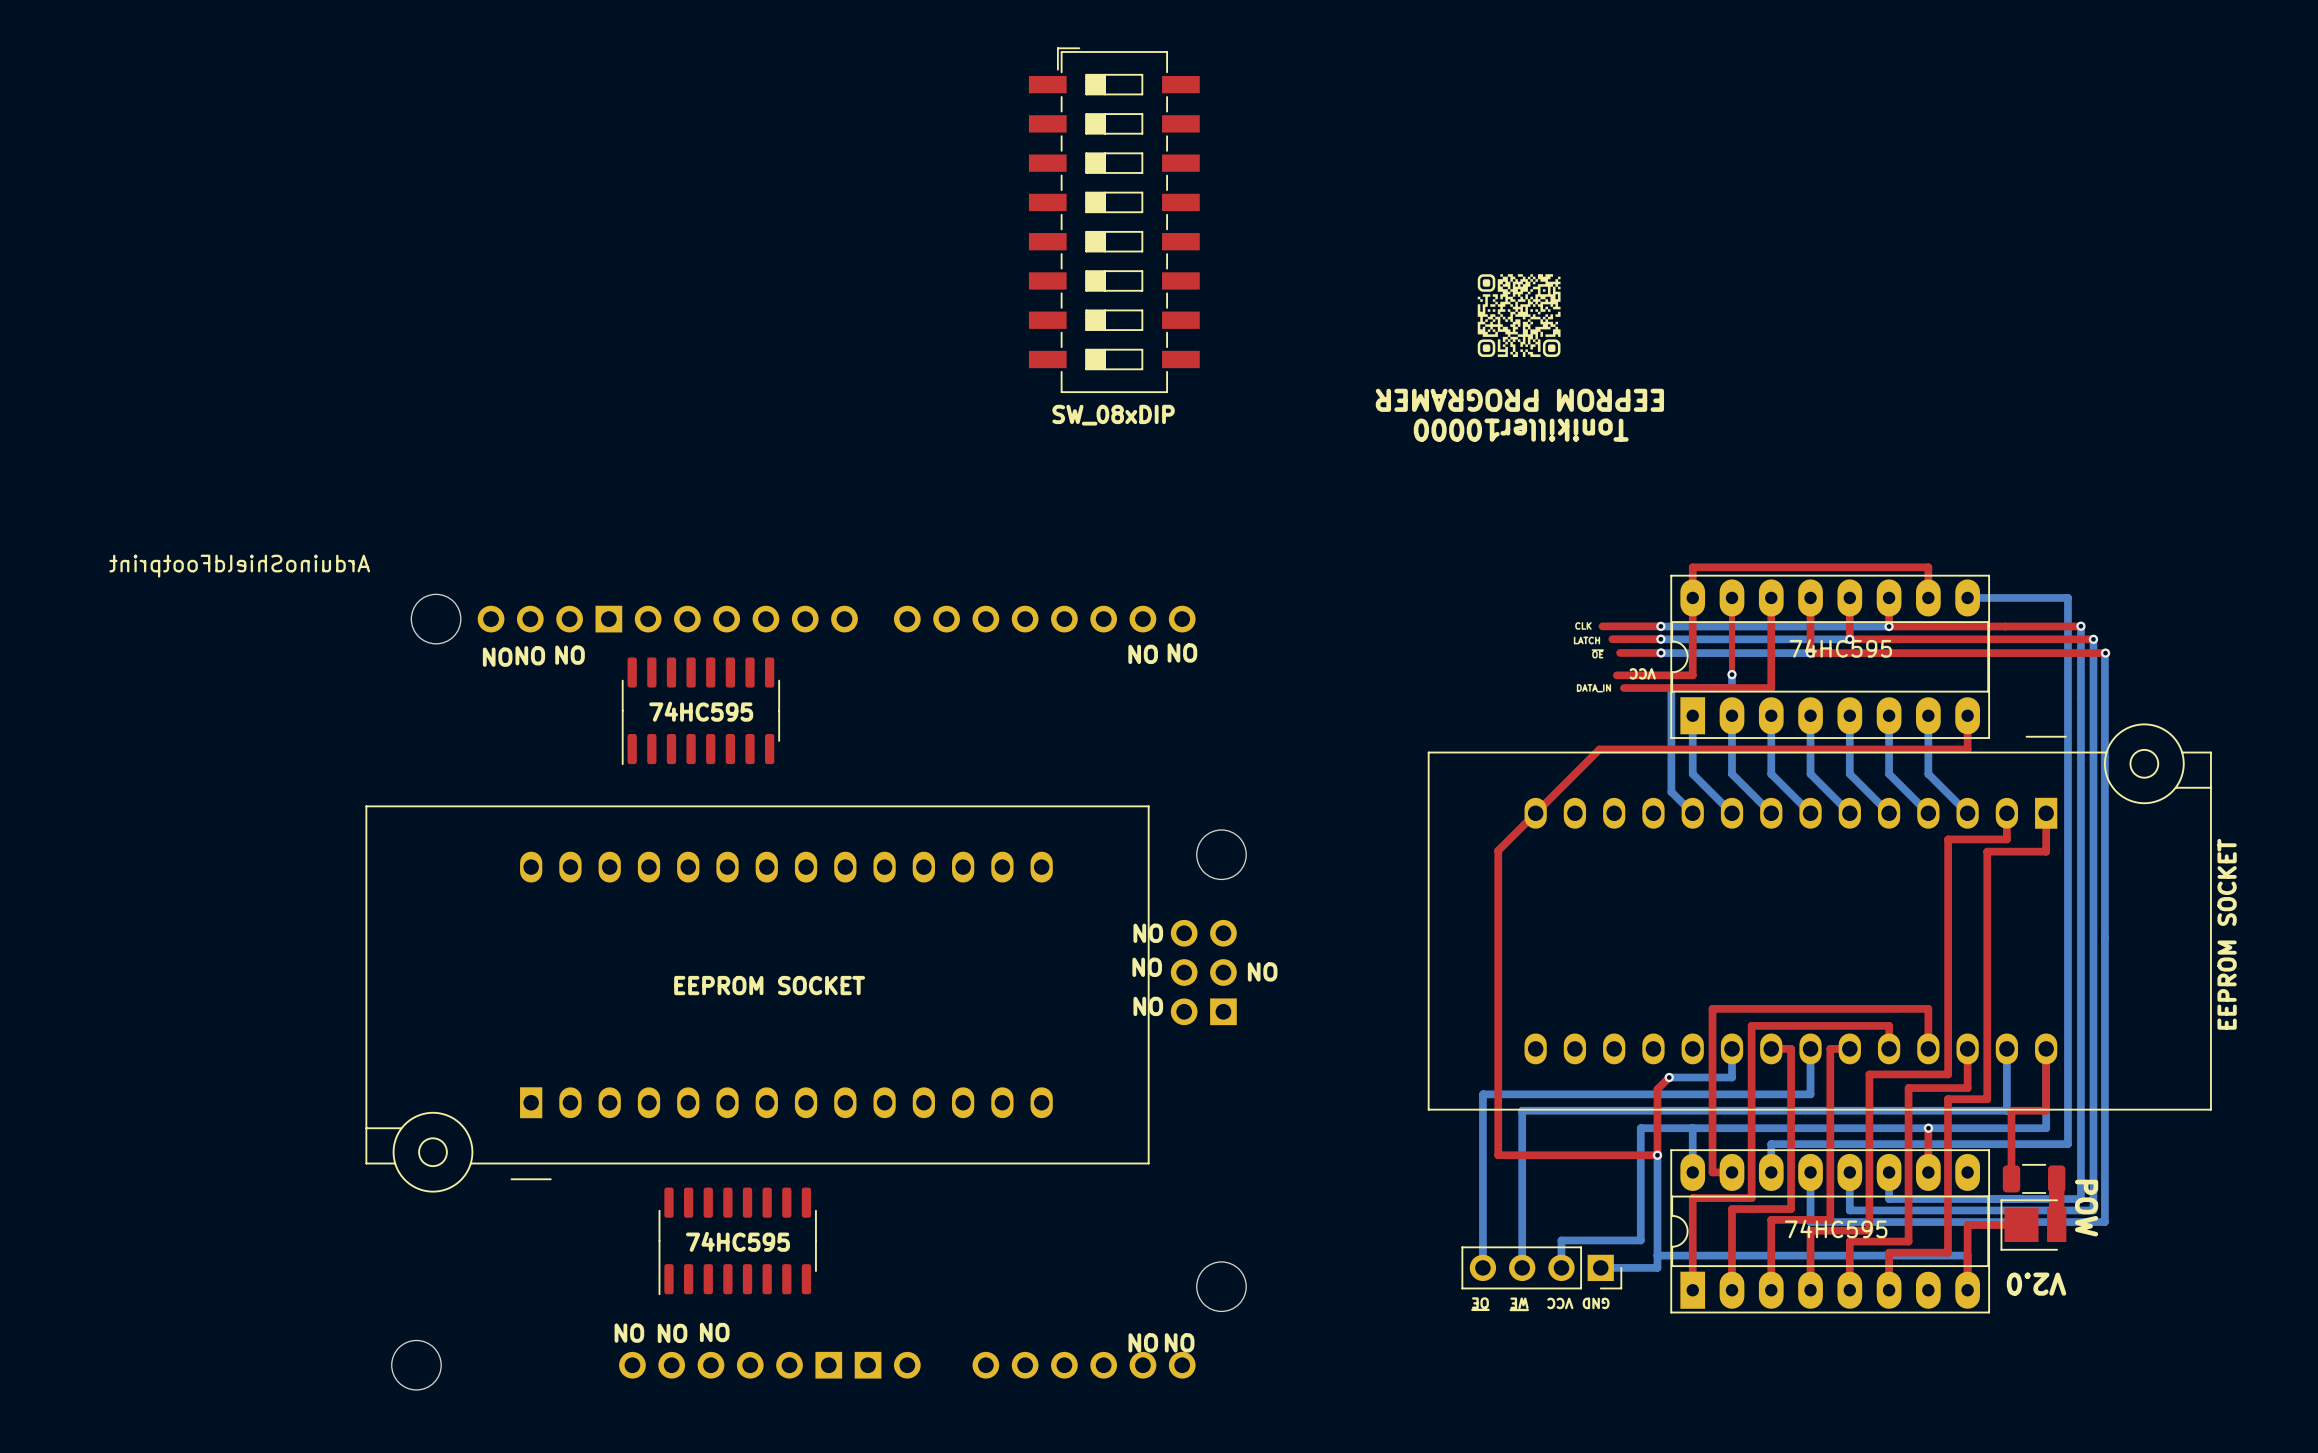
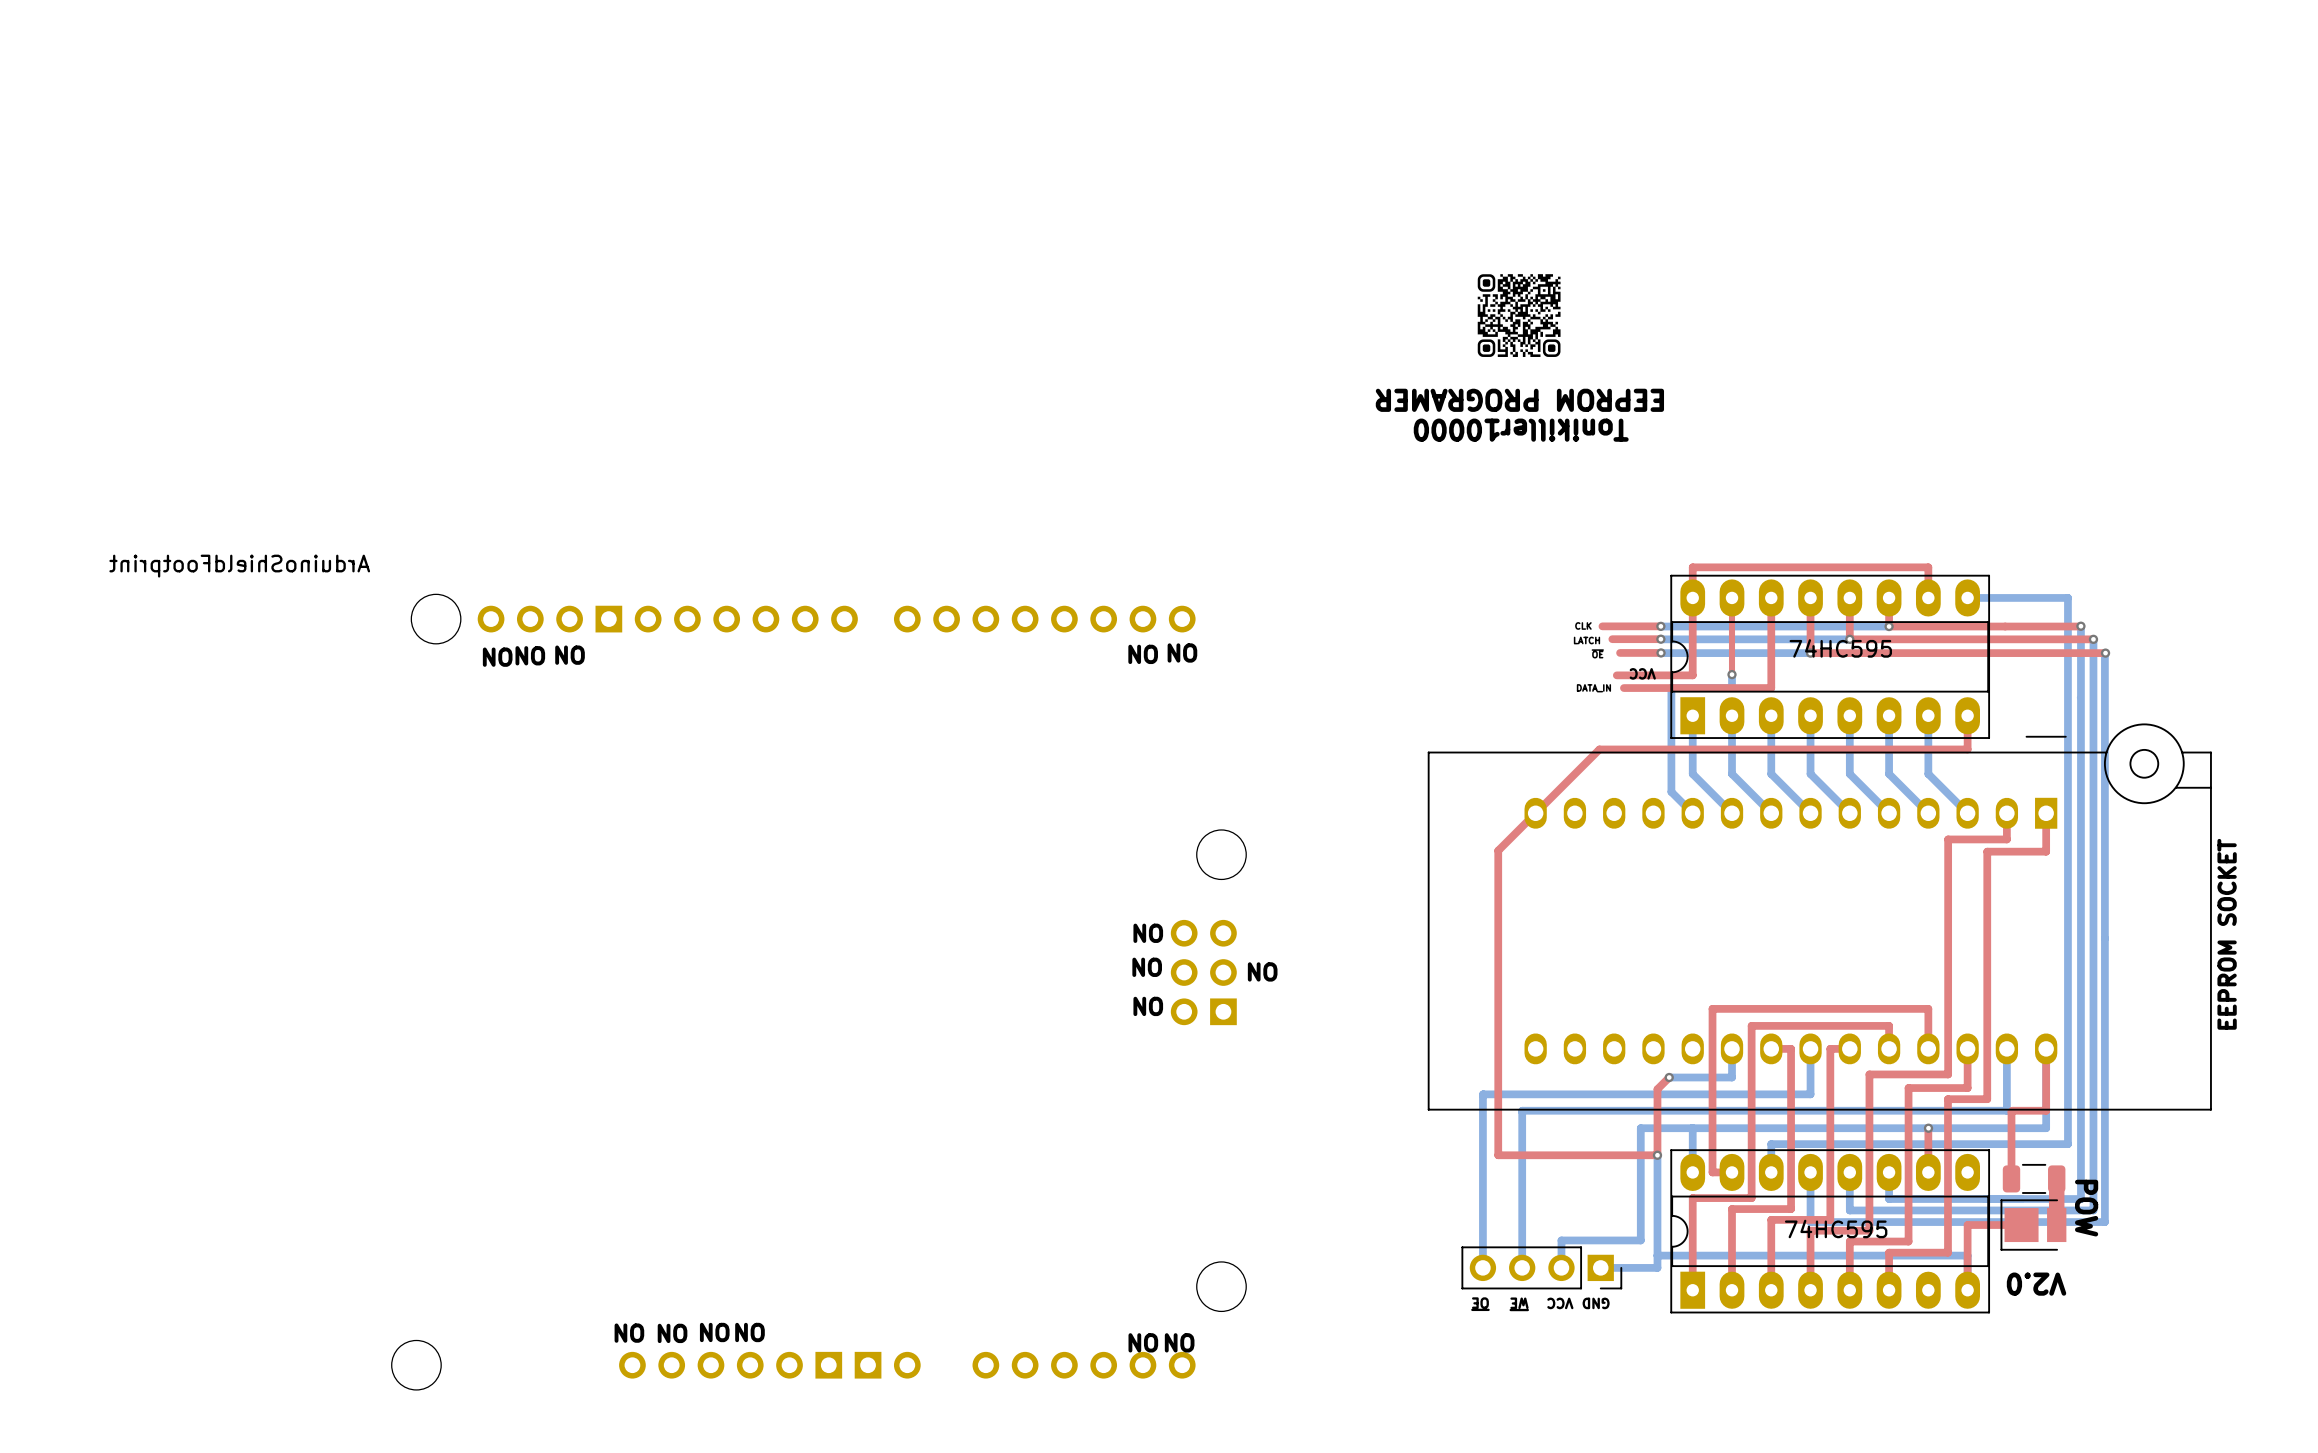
part: SW_08xDIP (1114, 220) -> none
part: 74HC595 (700, 711) -> none
EEPROM SOCKET: (757, 999) -> none
part: 74HC595 (737, 1241) -> none
text: none -> NO (749, 1332)

